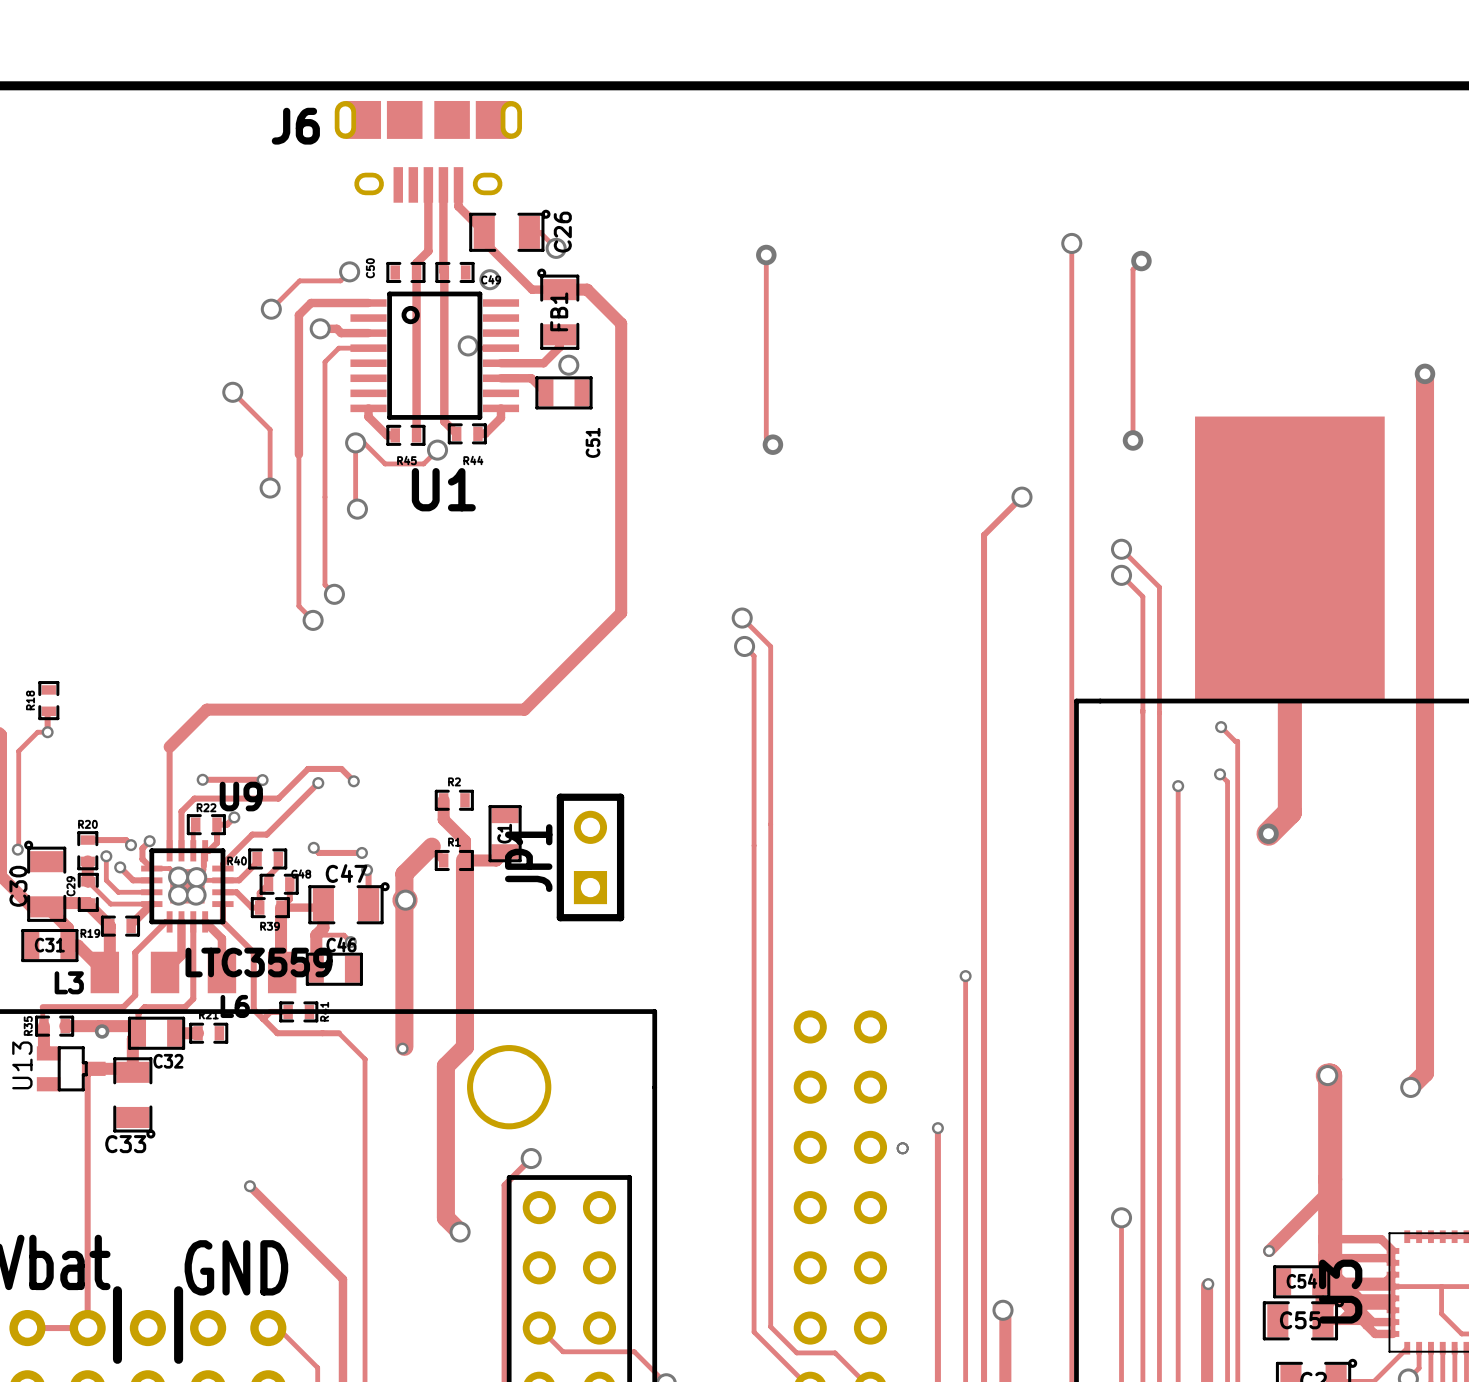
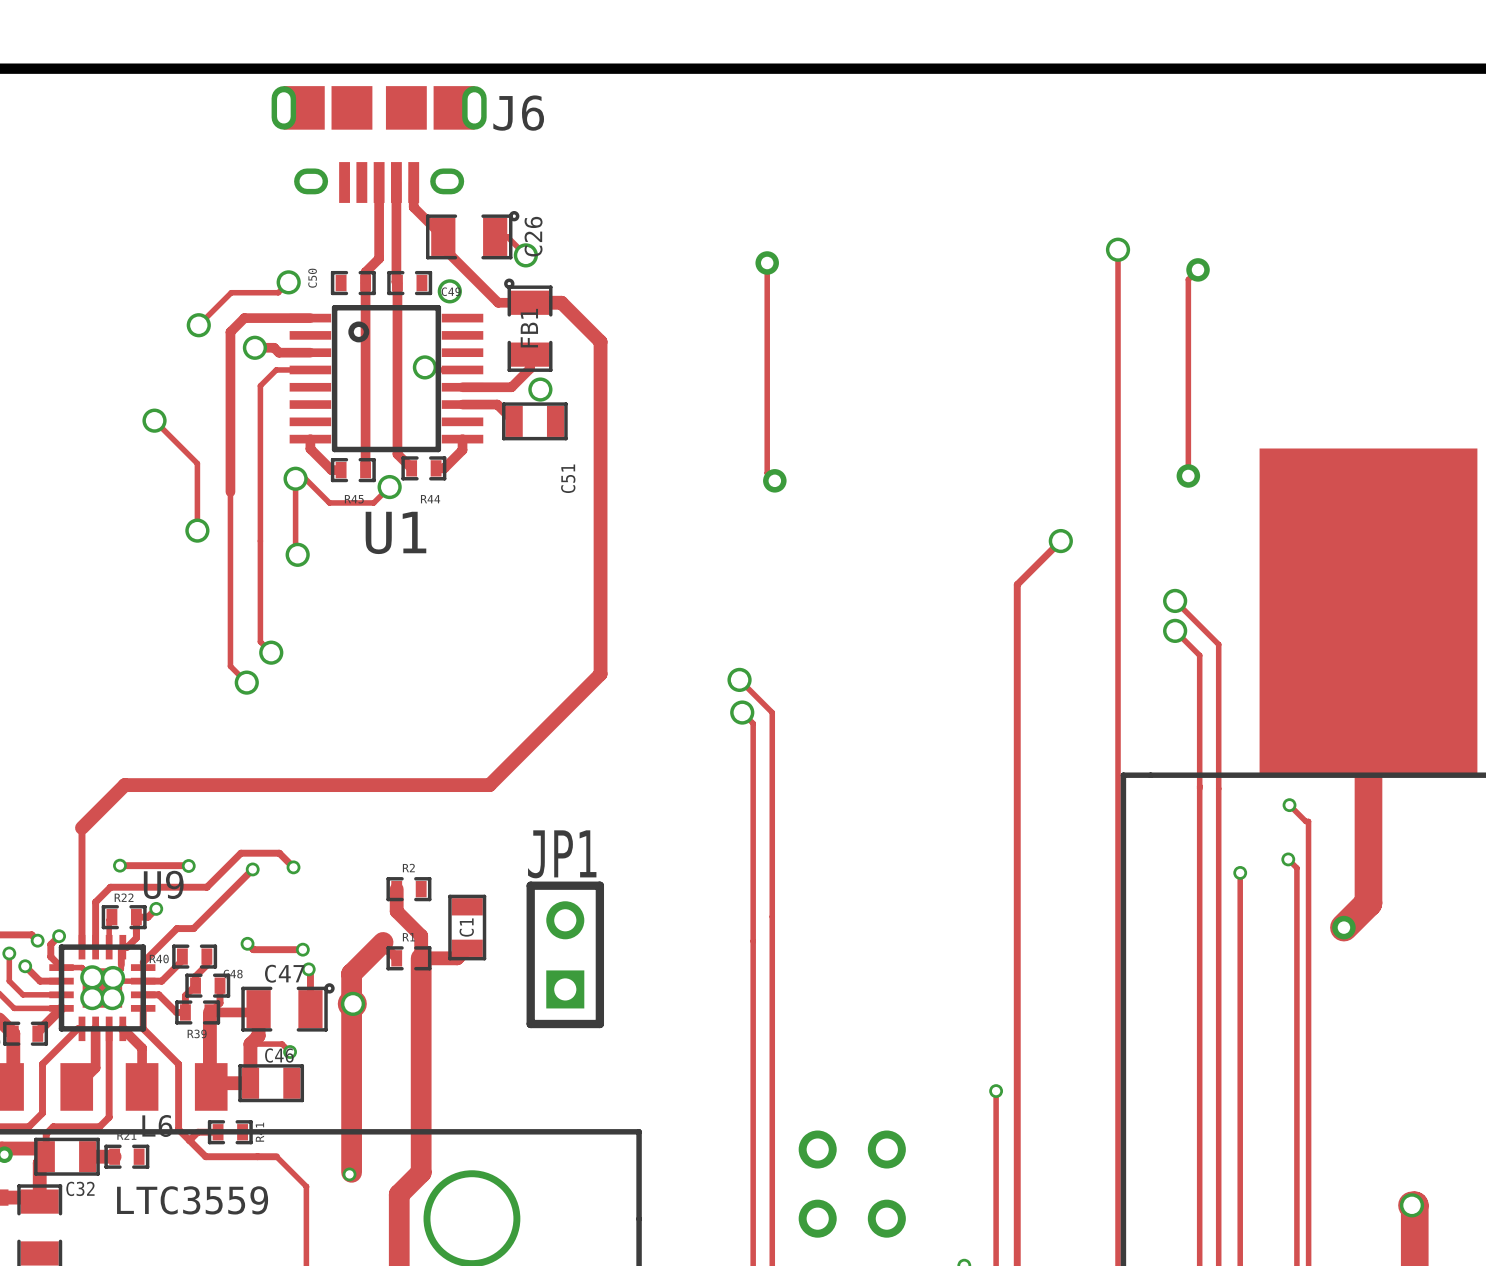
J6 name position: J6 (295, 126) -> J6 (518, 113)
JP1 name rotation: 0° (528, 858) -> 90° clockwise (562, 854)
JP1 name position: JP1 (528, 858) -> JP1 (562, 854)
U9 value position: LTC3559 (259, 962) -> LTC3559 (192, 1200)

